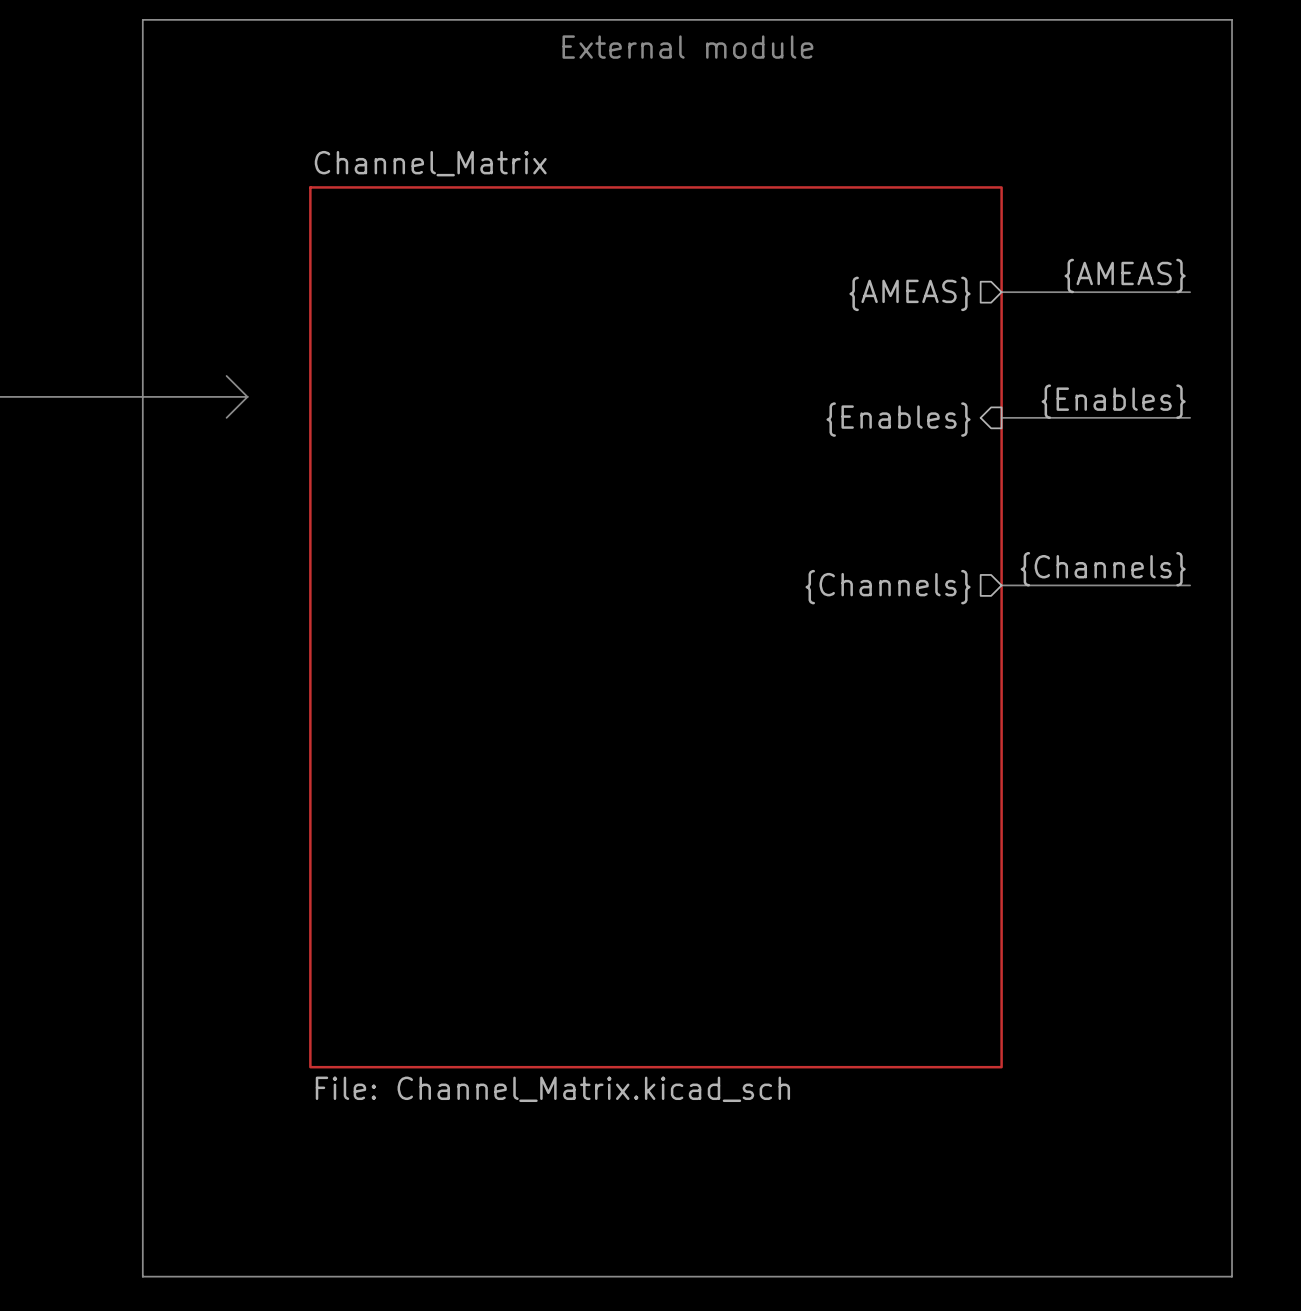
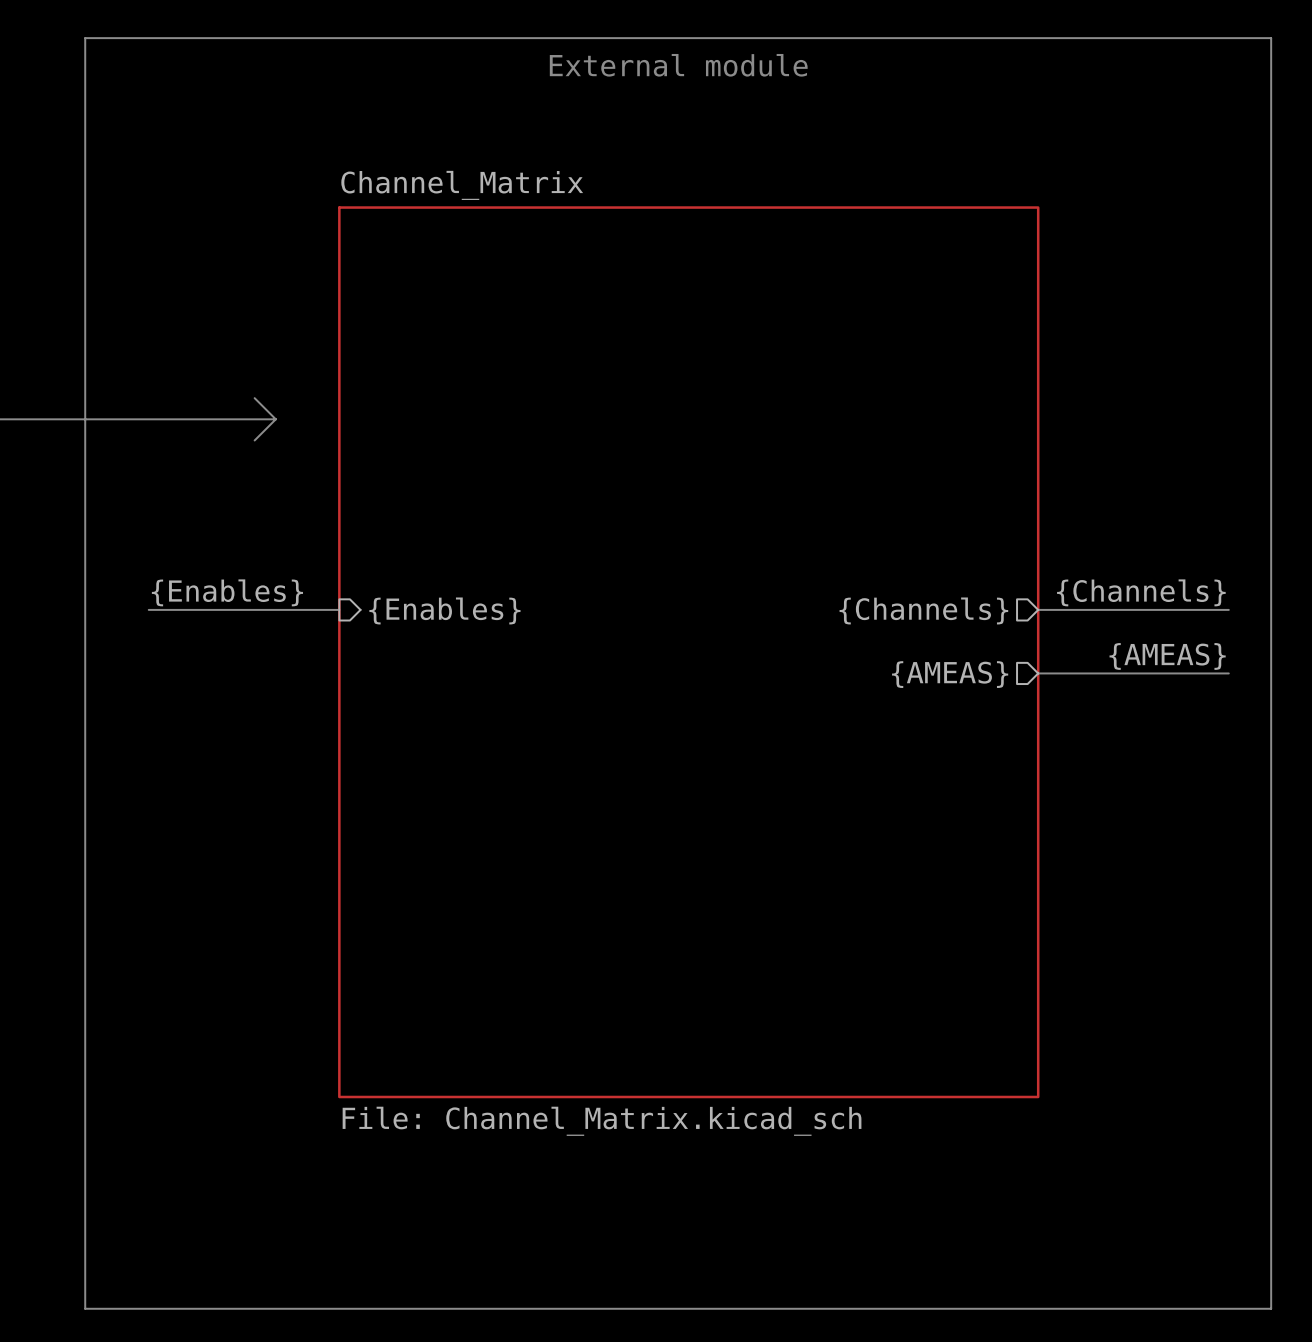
line: (142, 19) (142, 1276) -> (169, 38) (85, 38) (85, 1308) (169, 1308)
text position: External module (687, 47) -> External module (678, 65)
label position: {AMEAS} (1125, 275) -> {AMEAS} (1167, 656)
bus: (1001, 292) (1190, 292) -> none
sheet pin position: {AMEAS} (910, 293) -> {AMEAS} (950, 674)
label: {Enables} (1113, 401) -> none
bus: (1001, 417) (1190, 417) -> (1038, 673) (1228, 673)
sheet pin: {Enables} (898, 419) -> none
label: none -> {Enables} (227, 592)
bus: none -> (148, 609) (339, 609)
sheet pin: none -> {Enables} (444, 610)

